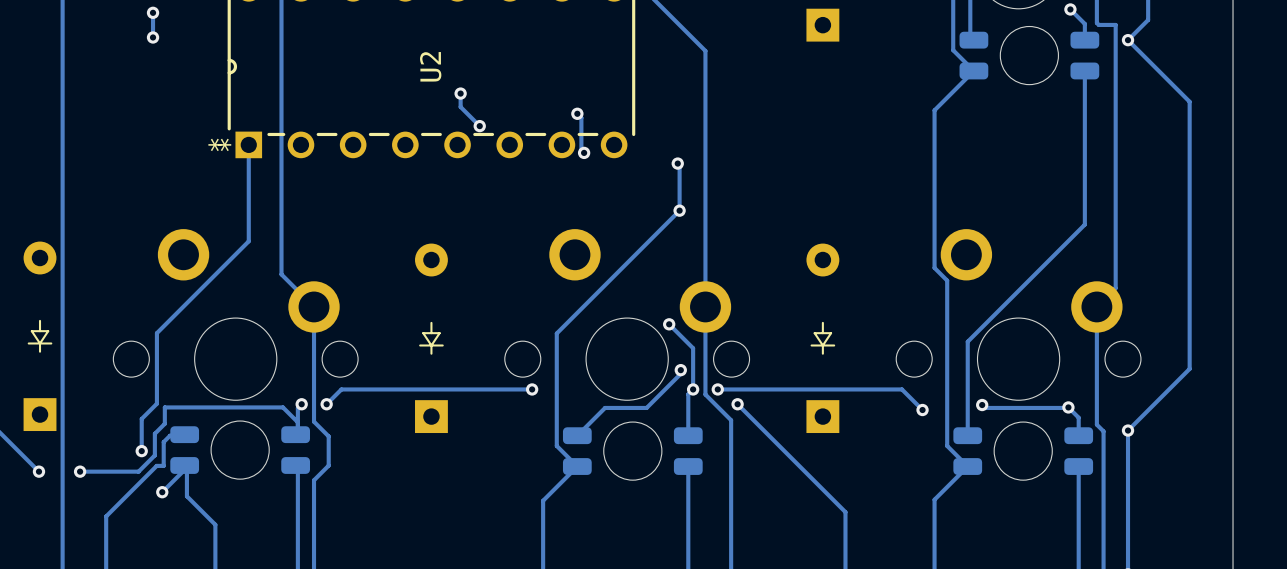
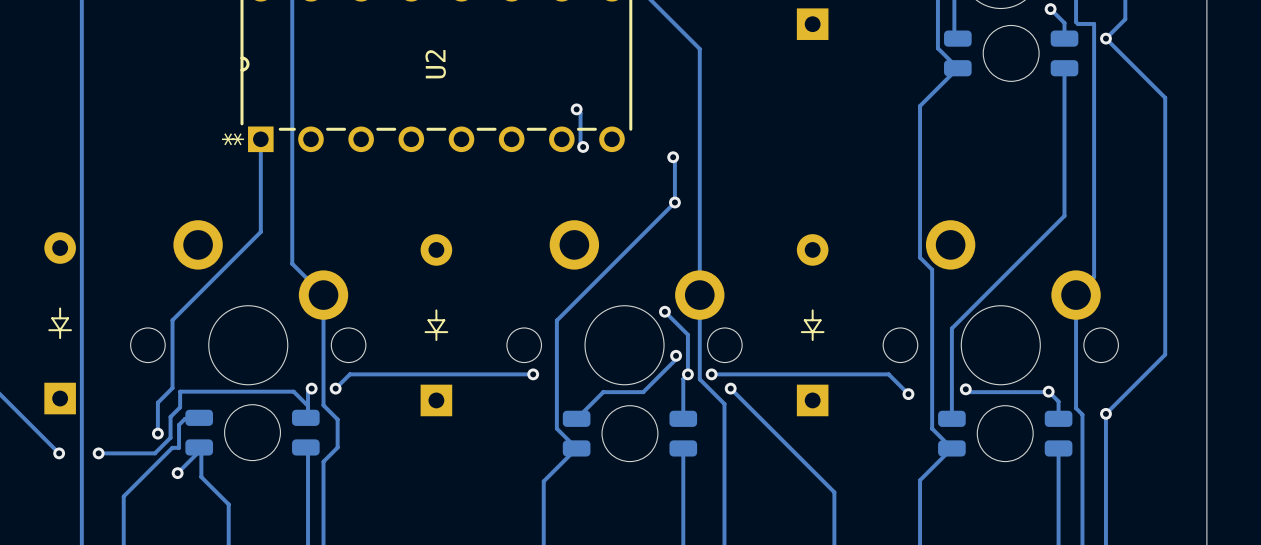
track: (153, 12) (153, 37) -> none
via: (153, 12) -> none
via: (153, 37) -> none
track: (460, 93) (460, 107) (479, 126) -> none
via: (460, 93) -> none
via: (479, 126) -> none

